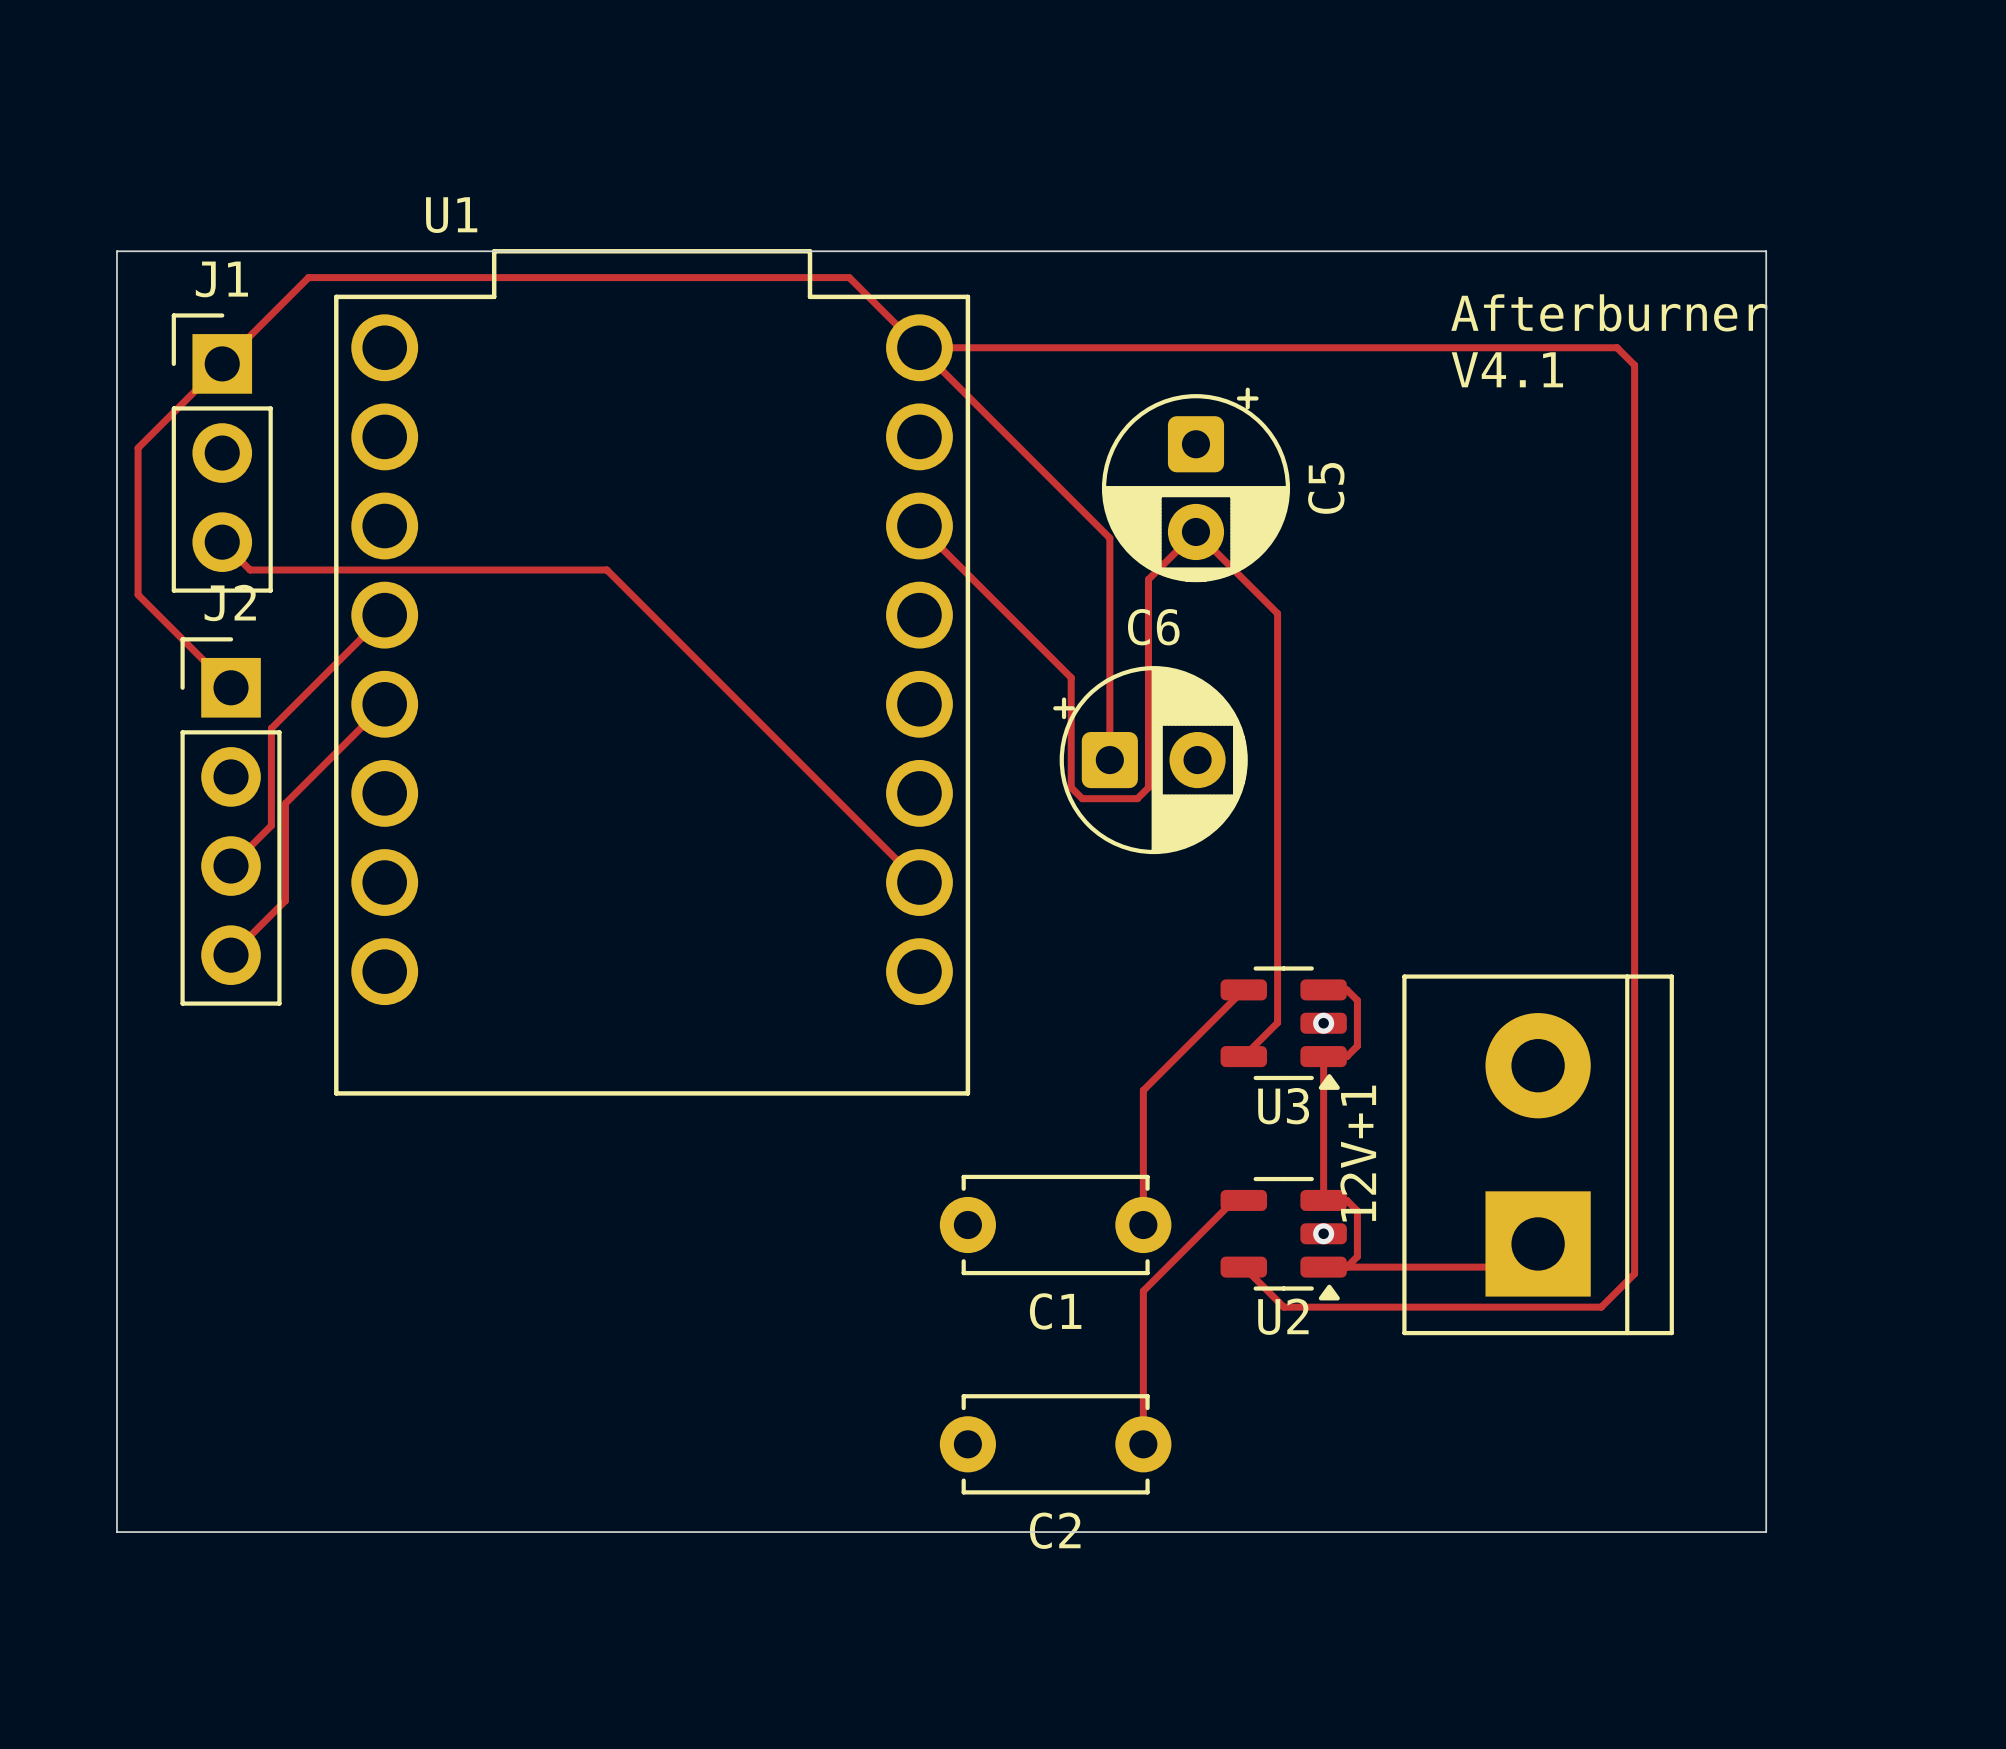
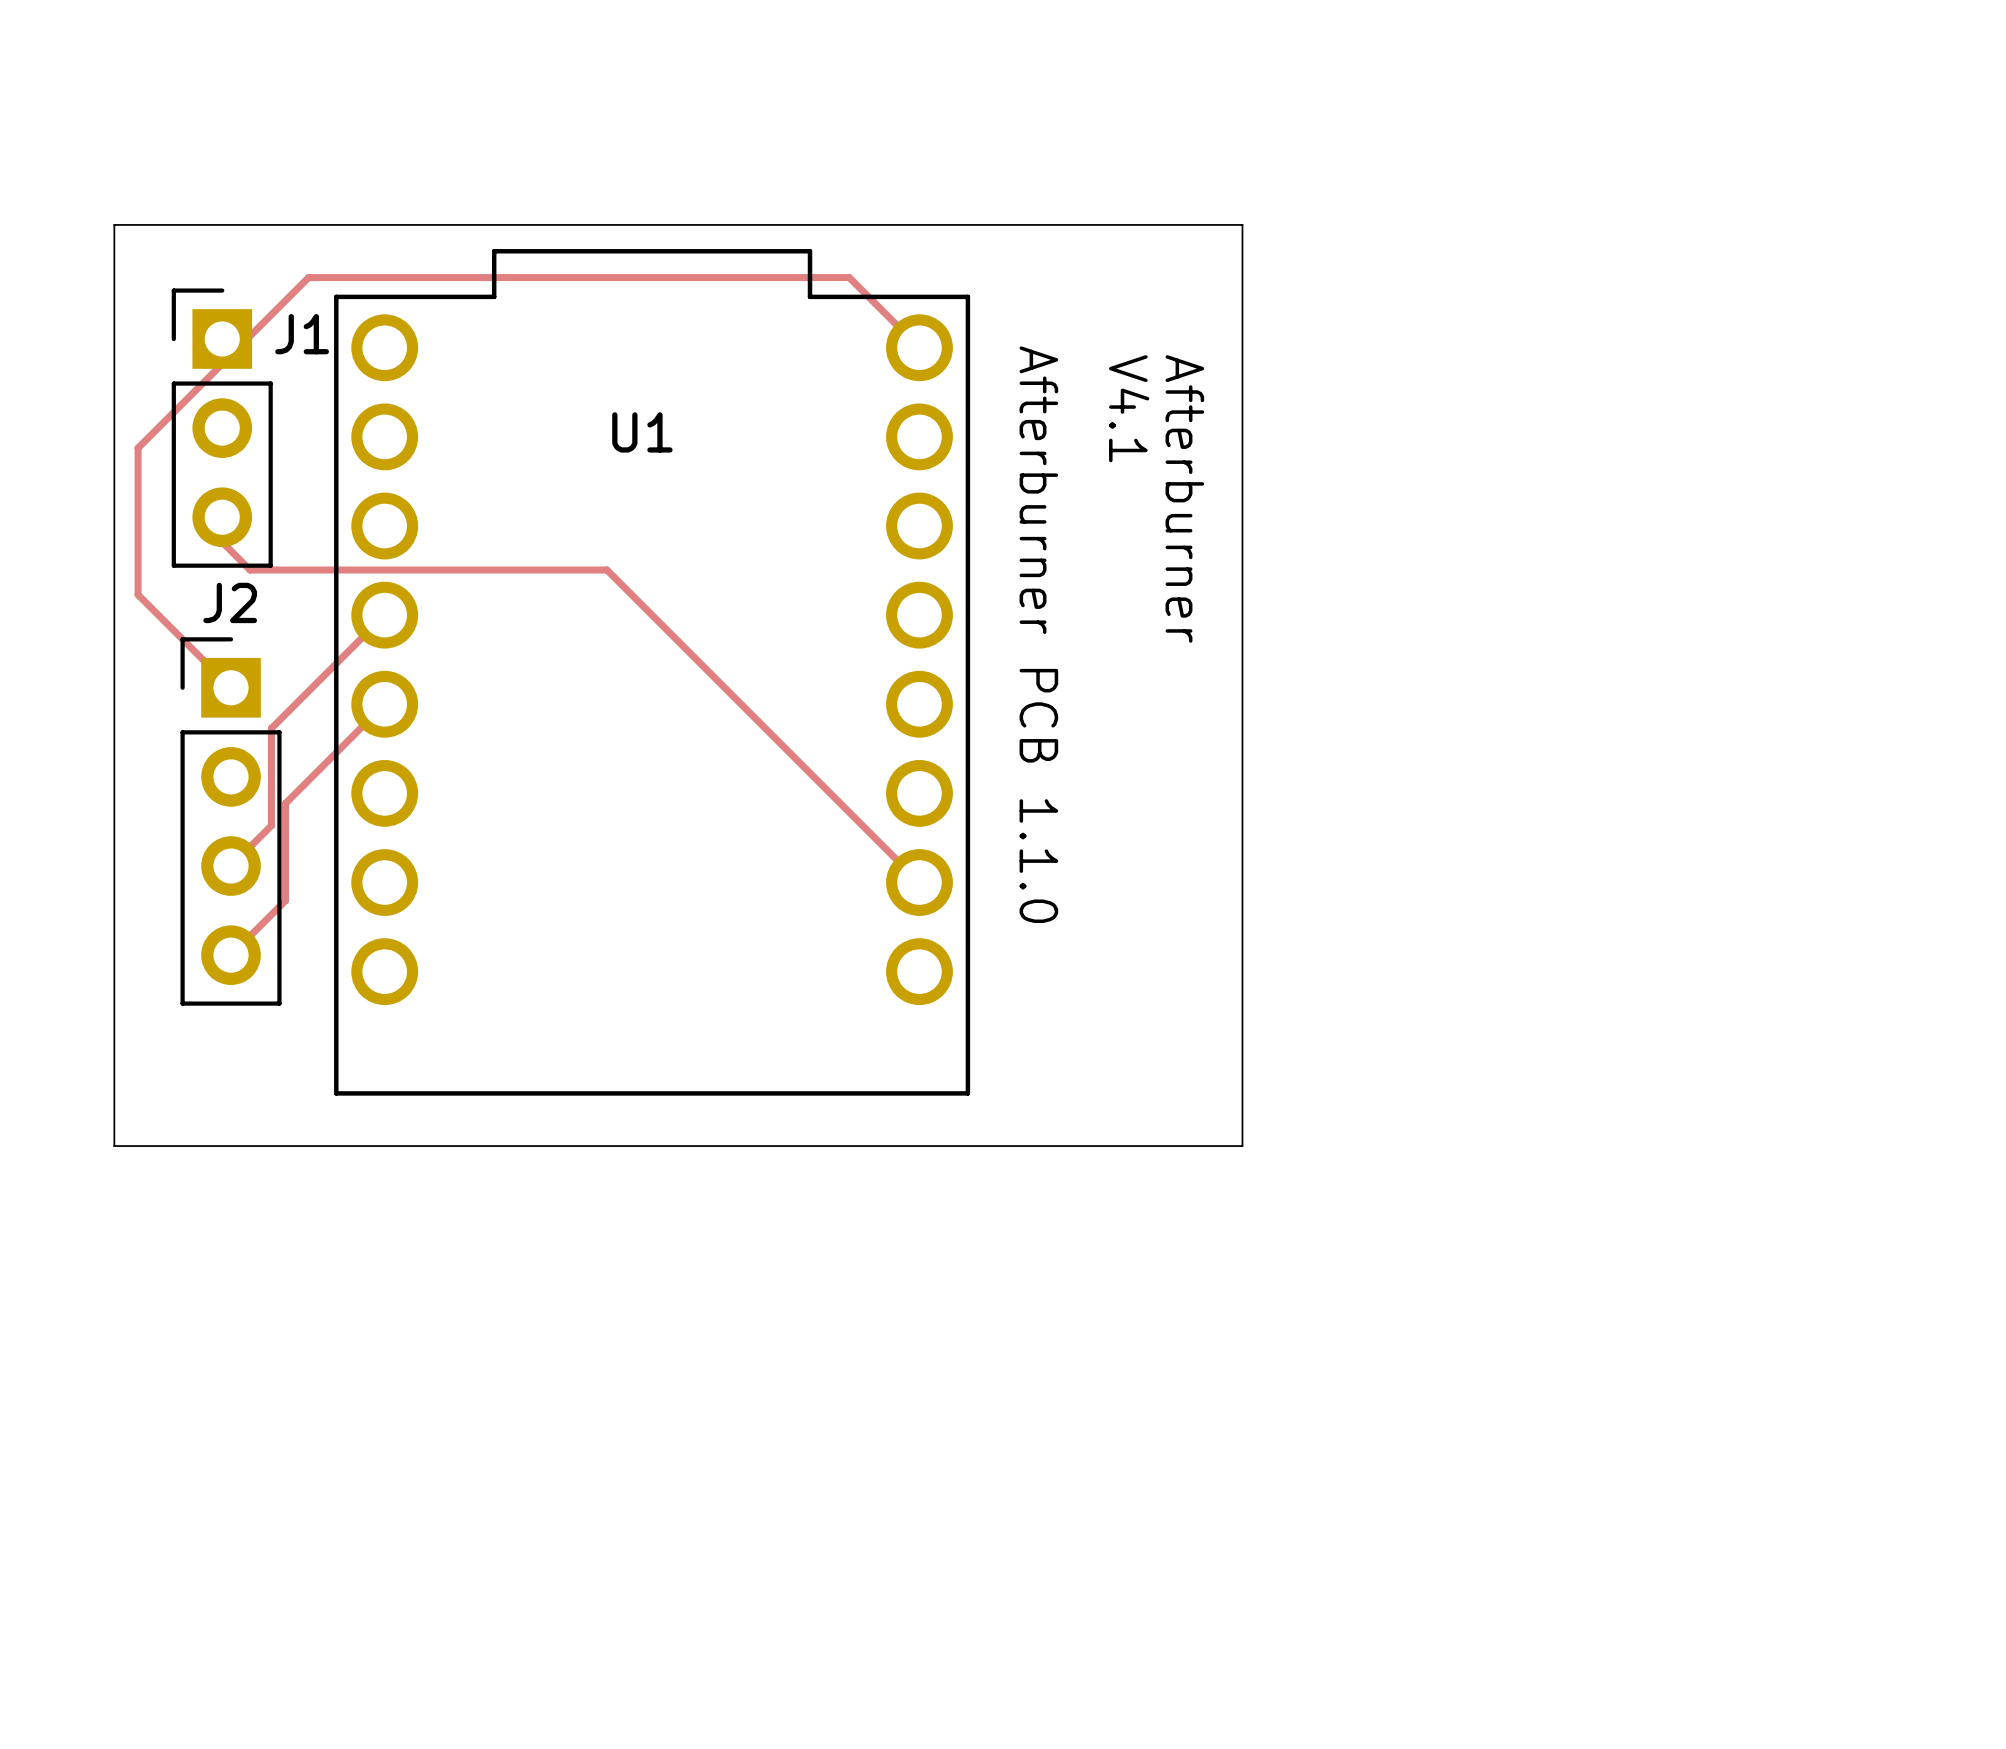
U1 name position: U1 (451, 215) -> U1 (642, 432)
board edge: none -> (114, 224) (1242, 224) (1242, 1146) (114, 1146) (114, 224)
board edge: (116, 251) (1766, 251) (1766, 1532) (116, 1532) (116, 251) -> none
J1 name position: J1 (221, 279) -> J1 (302, 334)
text rotation: 0° (1609, 312) -> 90° clockwise (1184, 498)
text position: Afterburner (1609, 312) -> Afterburner (1184, 498)
text rotation: 0° (1507, 369) -> 90° clockwise (1129, 408)
text position: V4.1 (1507, 369) -> V4.1 (1129, 408)
J1 position: (222, 453) -> (222, 428)
C5: (1195, 484) -> none
track: (919, 526) (1071, 677) (1071, 787) (1082, 798) (1137, 798) (1148, 787) (1148, 579) (1195, 531) (1277, 613) (1277, 1022) (1243, 1056) -> none
text: none -> Afterburner PCB 1.1.0 (1038, 634)
C6: (1150, 760) -> none
track: (1104, 765) (1109, 760) (1109, 538) (919, 347) (1617, 347) (1634, 365) (1634, 1273) (1601, 1307) (1283, 1307) (1243, 1267) -> none
track: (1243, 989) (1143, 1090) (1143, 1225) -> none
track: (1323, 989) (1346, 989) (1357, 1000) (1357, 1046) (1346, 1056) (1323, 1056) (1323, 1200) (1346, 1200) (1357, 1211) (1357, 1256) (1346, 1267) -> none
via: (1323, 1023) -> none
U3: (1283, 1028) -> none
12V+1: (1538, 1154) -> none
track: (1243, 1200) (1233, 1200) (1143, 1291) (1143, 1444) -> none
C1: (1055, 1225) -> none
via: (1323, 1233) -> none
U2: (1283, 1238) -> none
track: (1538, 1243) (1514, 1267) (1323, 1267) -> none
C2: (1055, 1444) -> none

